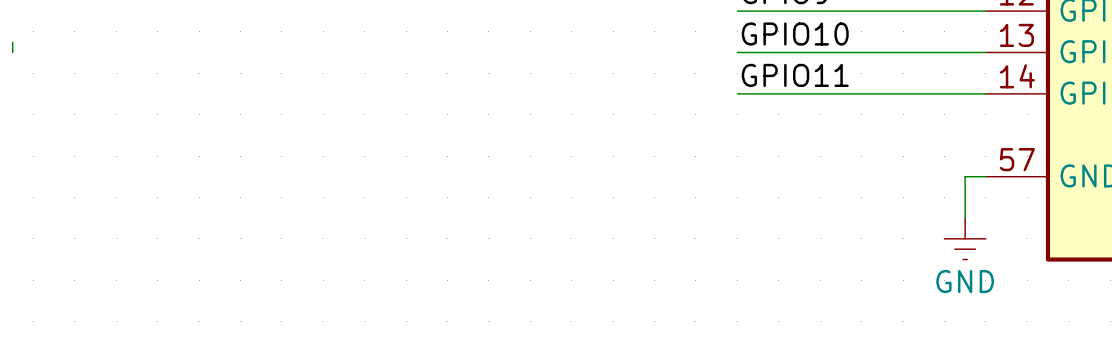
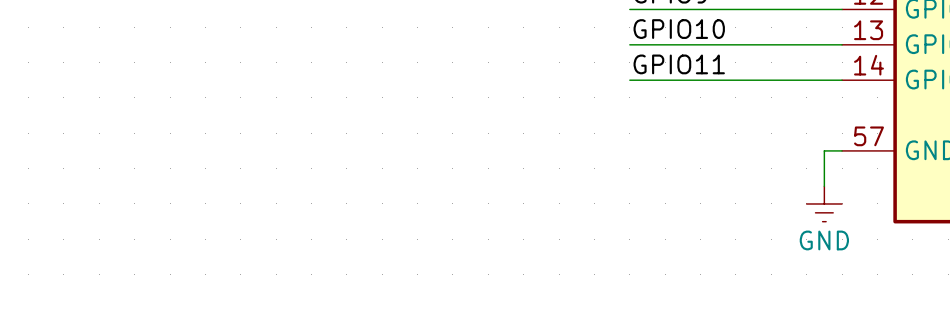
wire: (12, 42) (12, 52) -> none

